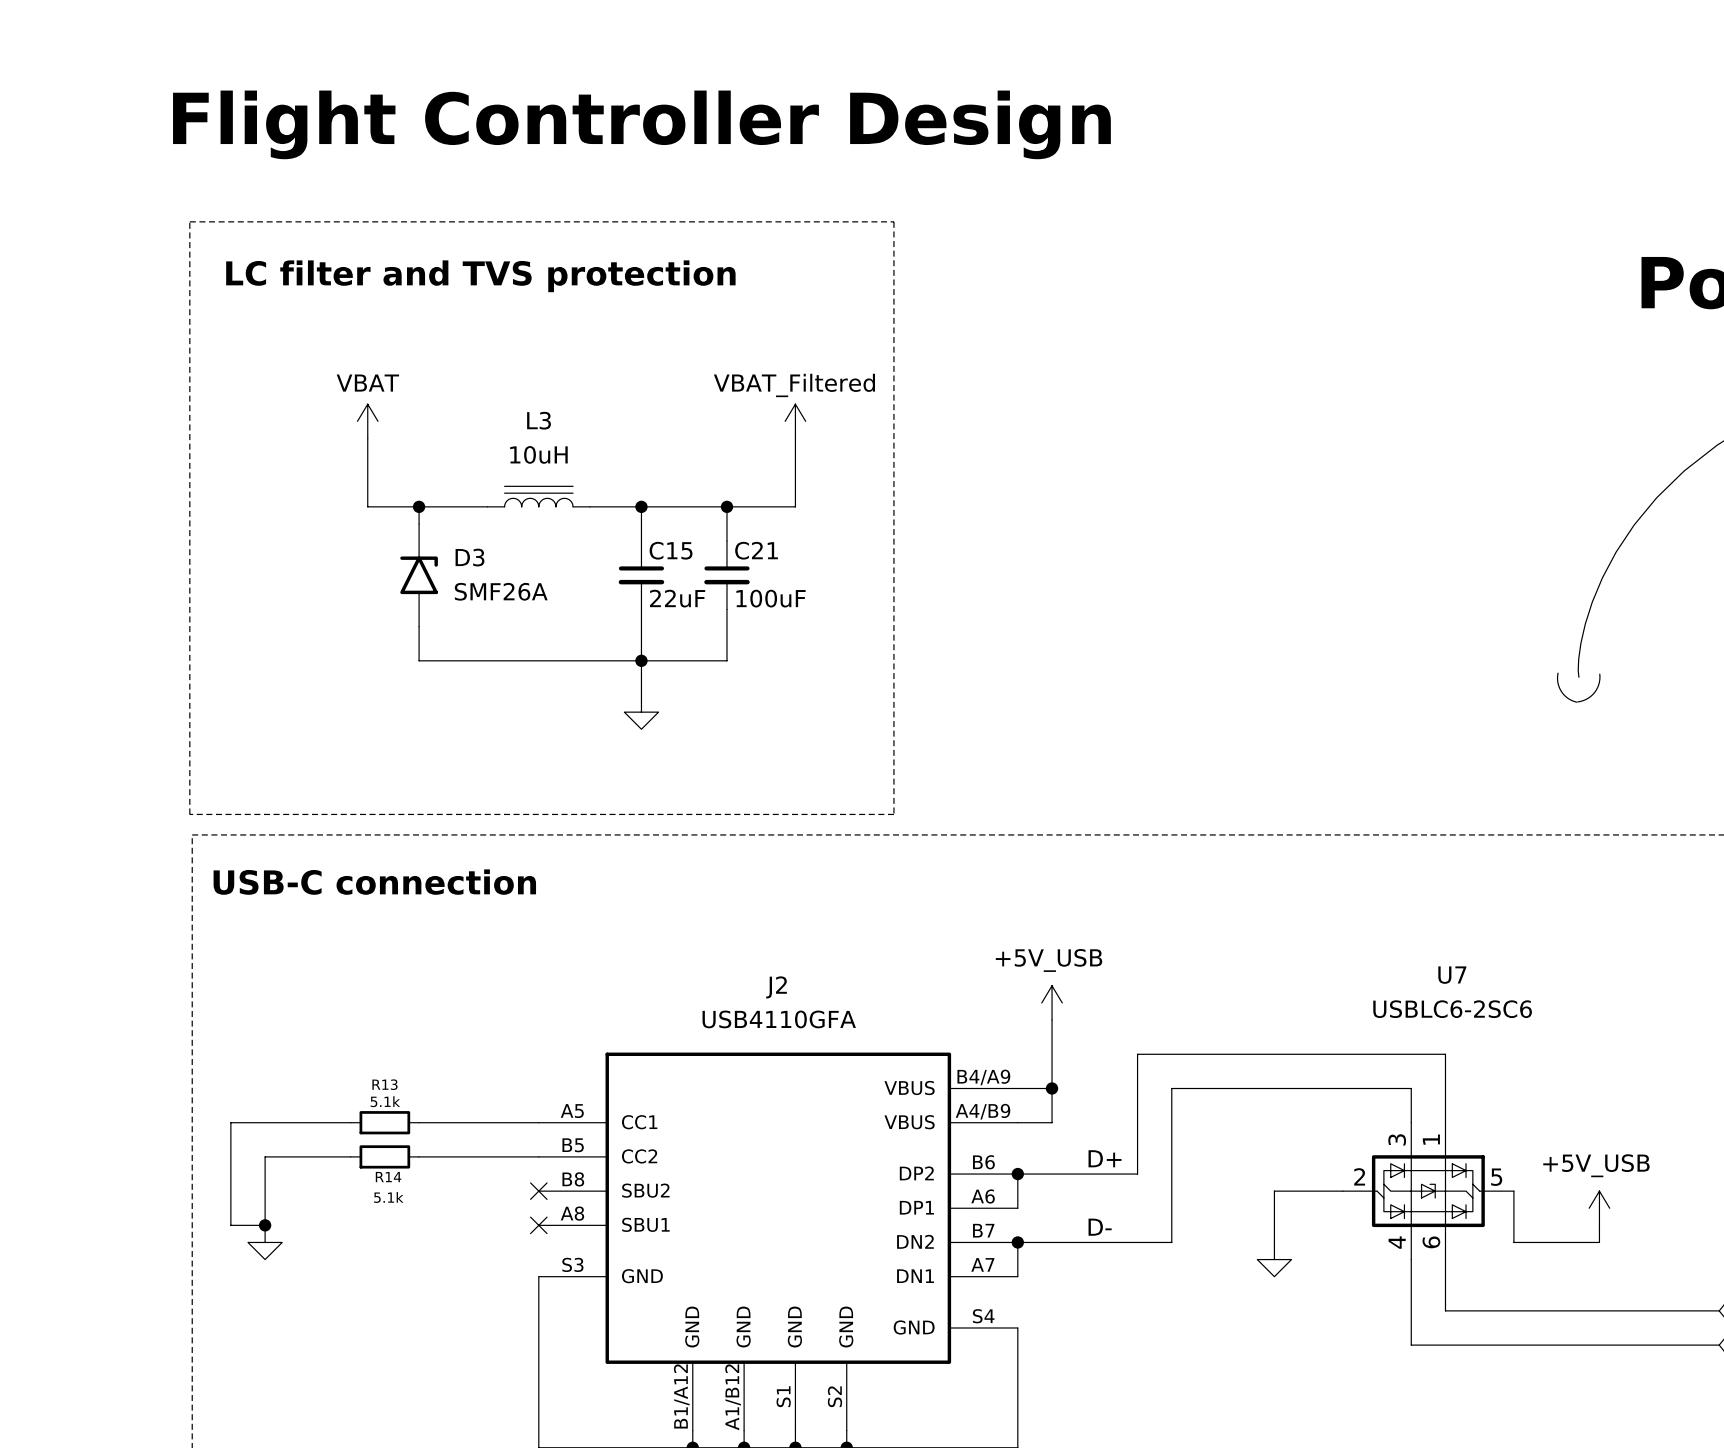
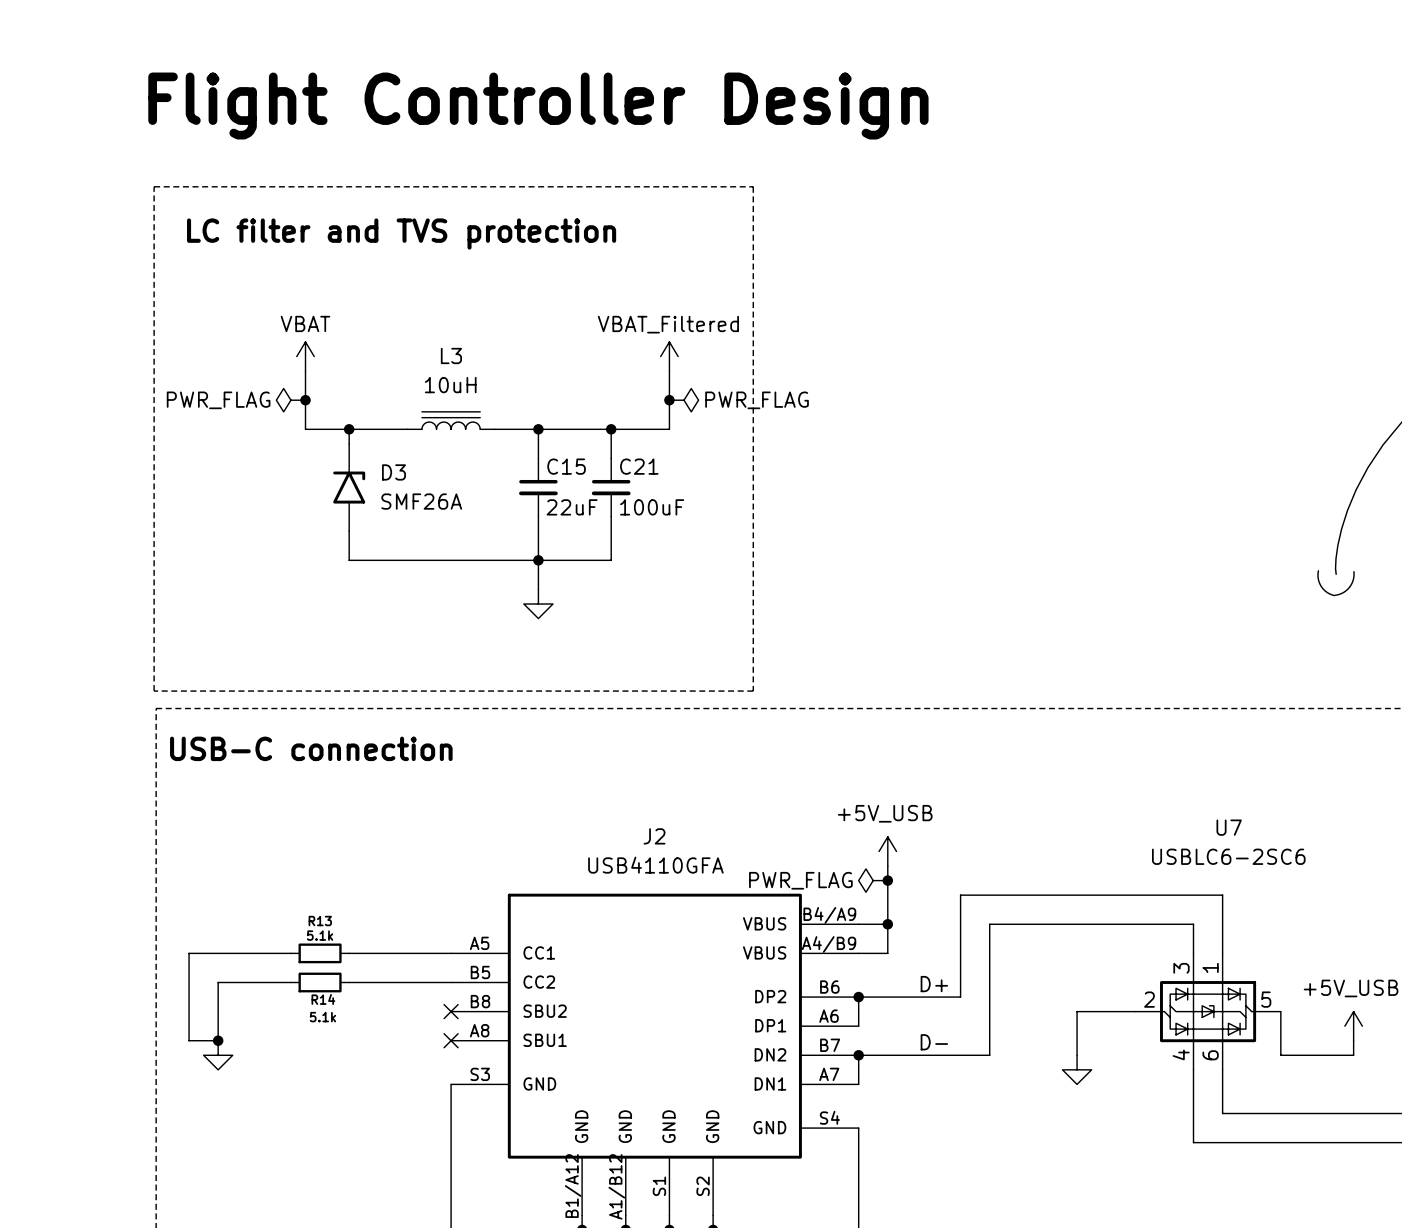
power symbol: none -> PWR_FLAG (290, 400)
junction: none -> (305, 400)
junction: none -> (669, 400)
power symbol: none -> PWR_FLAG (683, 400)
power symbol: none -> PWR_FLAG (873, 880)
junction: none -> (887, 880)

